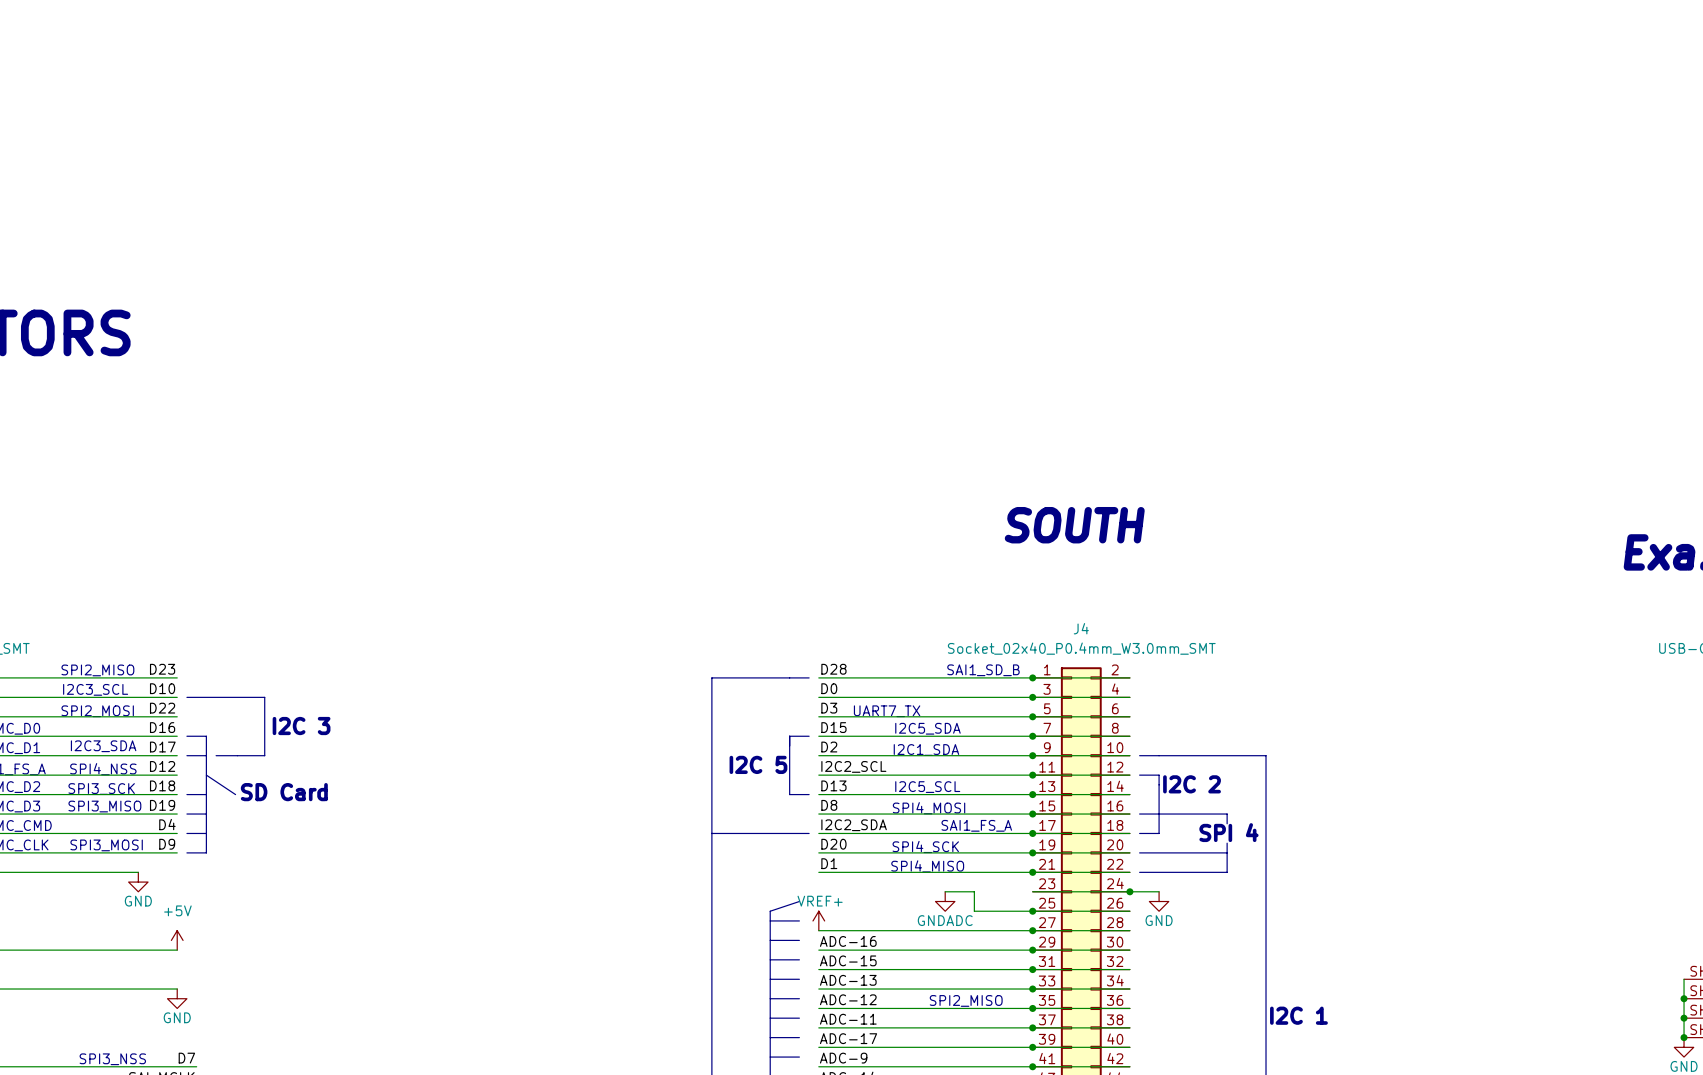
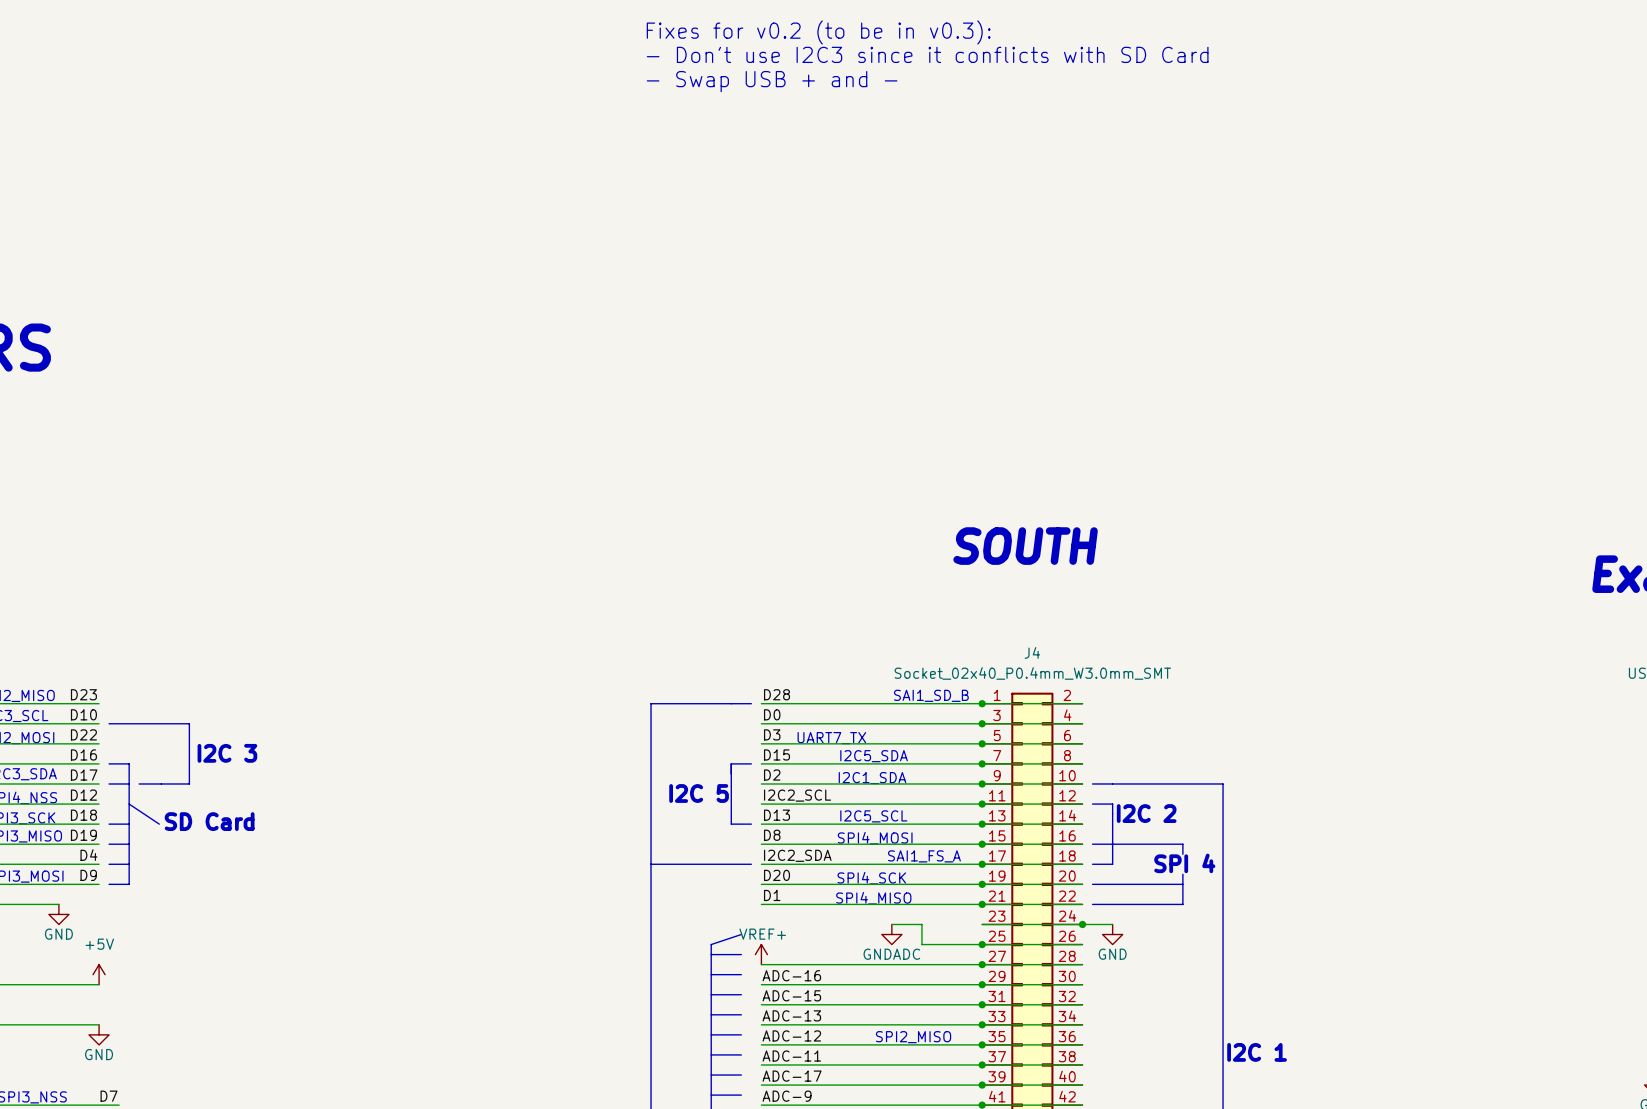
text: none -> Fixes for v0.2 (to be in v0.3): (818, 32)
text: none -> - Don't use I2C3 since it conflicts with SD Card (927, 54)
text: none -> - Swap USB + and - (772, 81)

